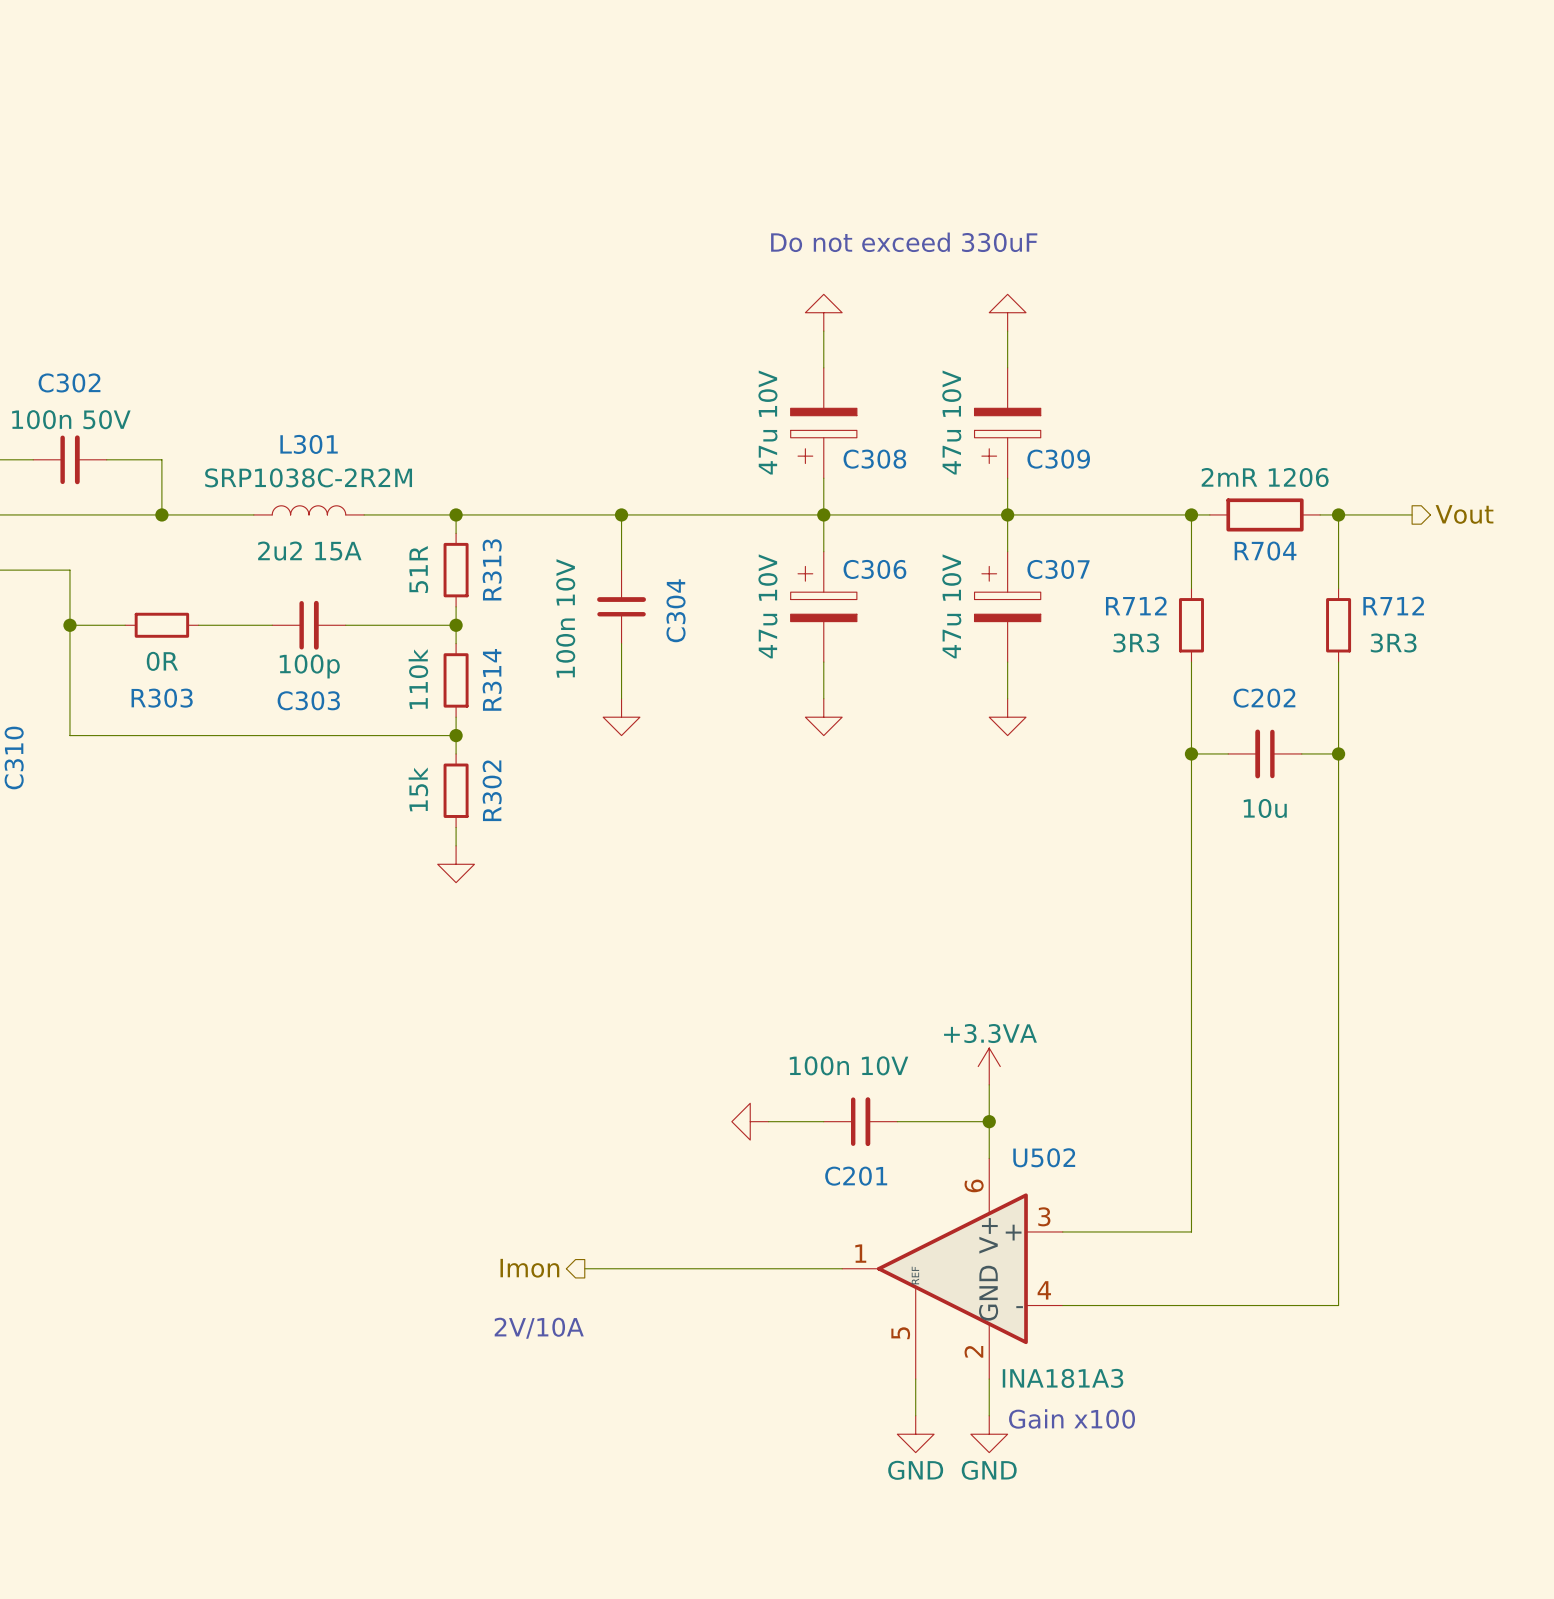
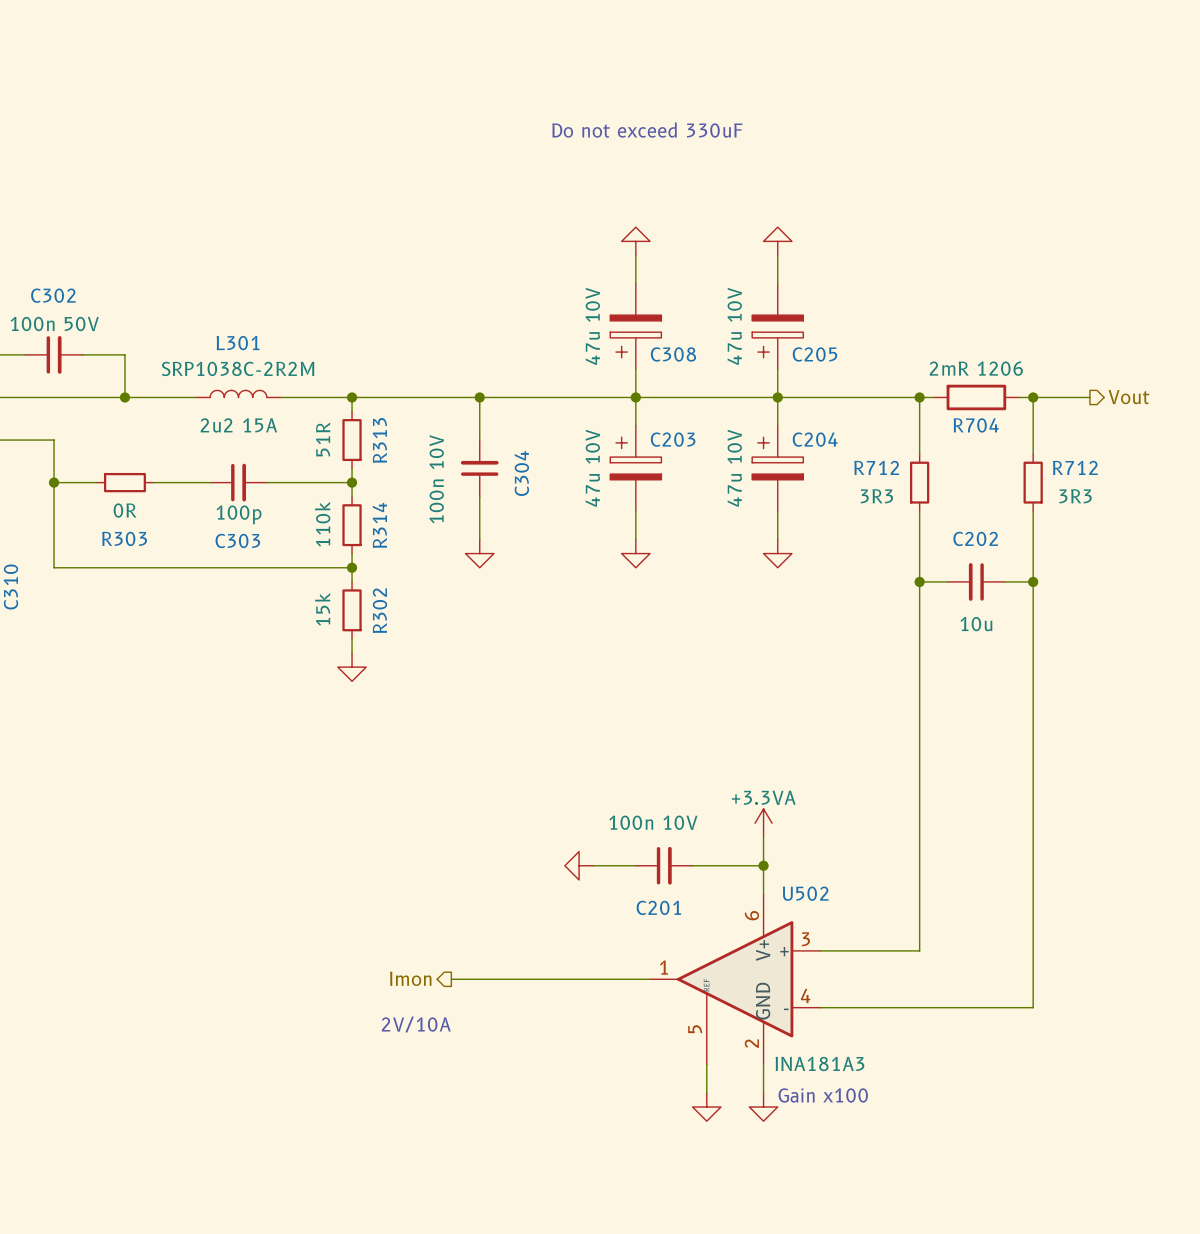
text position: Do not exceed 330uF (904, 242) -> Do not exceed 330uF (647, 130)
C309 name: C309 (1058, 459) -> C205 (814, 354)
C306 name: C306 (874, 569) -> C203 (673, 439)
C307 name: C307 (1058, 569) -> C204 (815, 439)
power symbol text: GND (915, 1470) -> none
power symbol text: GND (989, 1470) -> none

